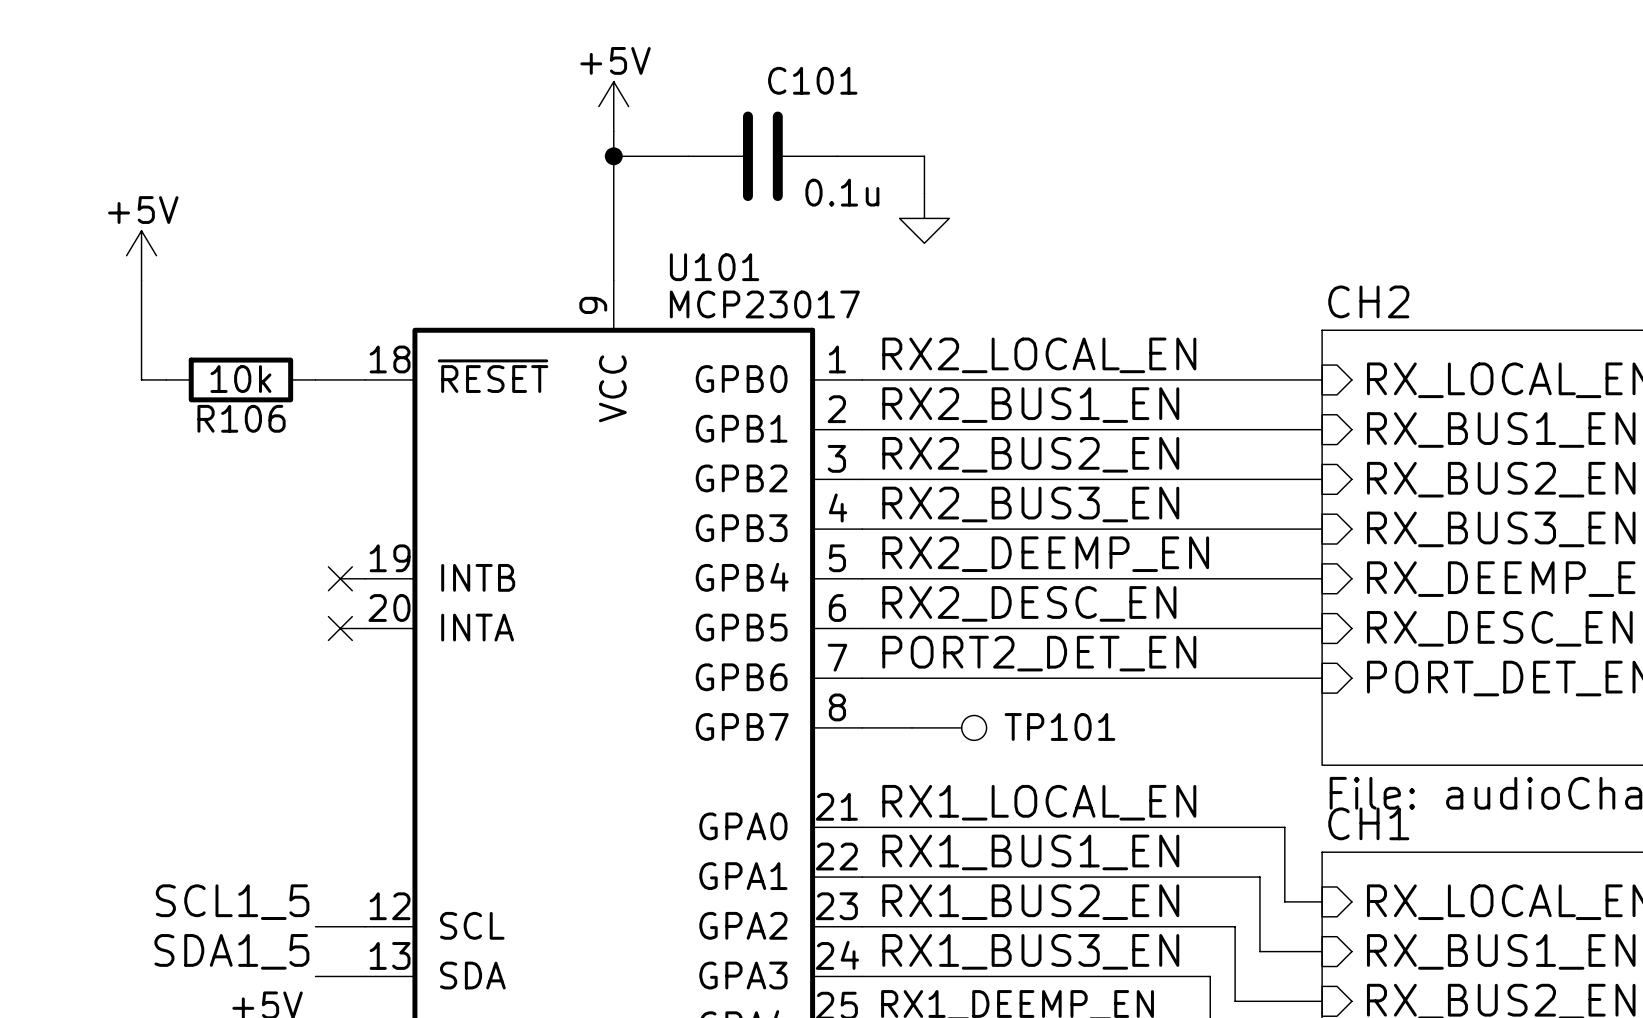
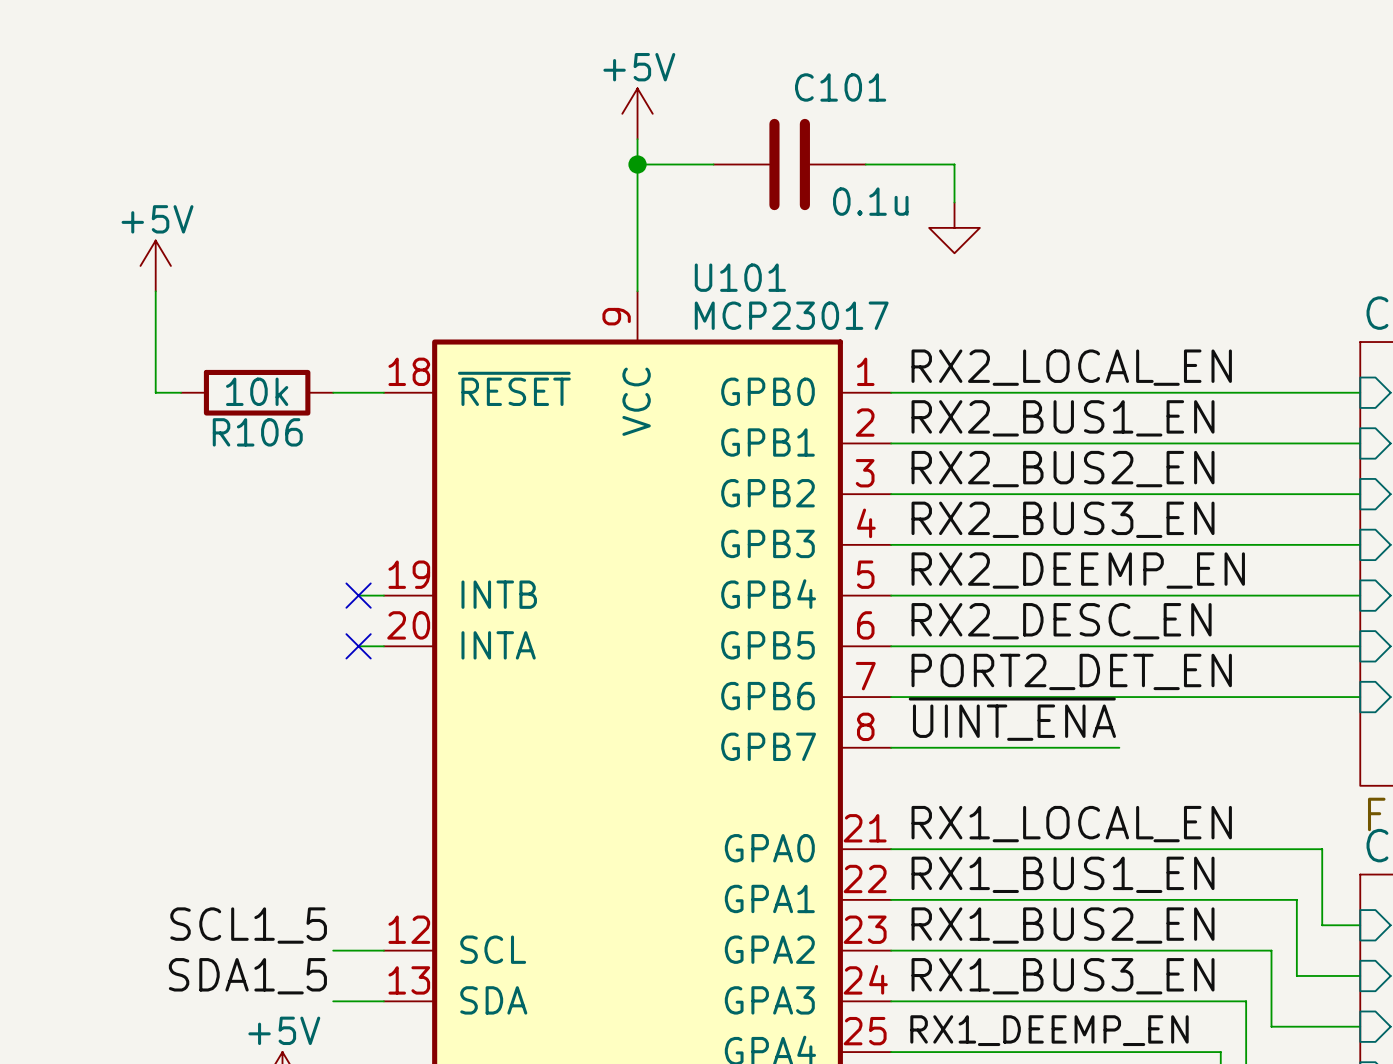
label: none -> ~{UINT_ENA} (1012, 719)
wire: none -> (941, 747) (1119, 747)
TP101: (949, 727) -> none

